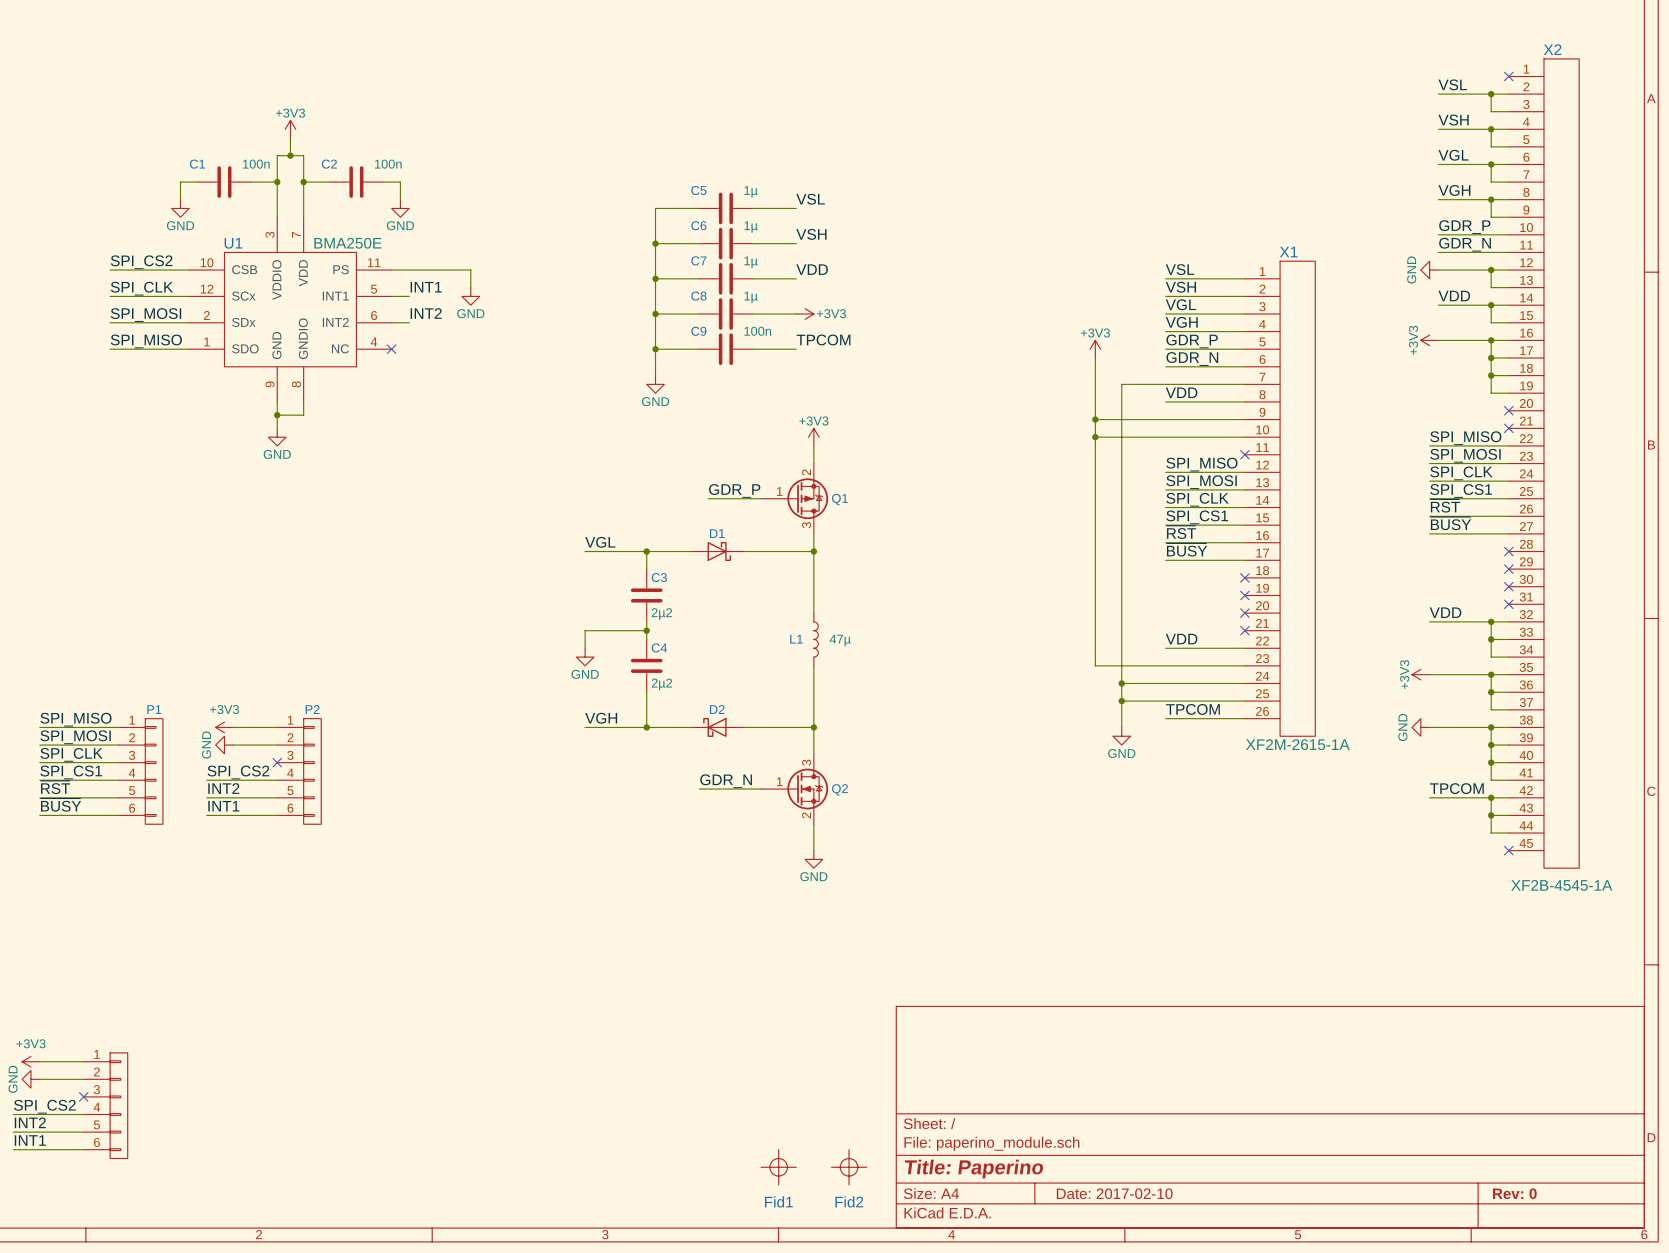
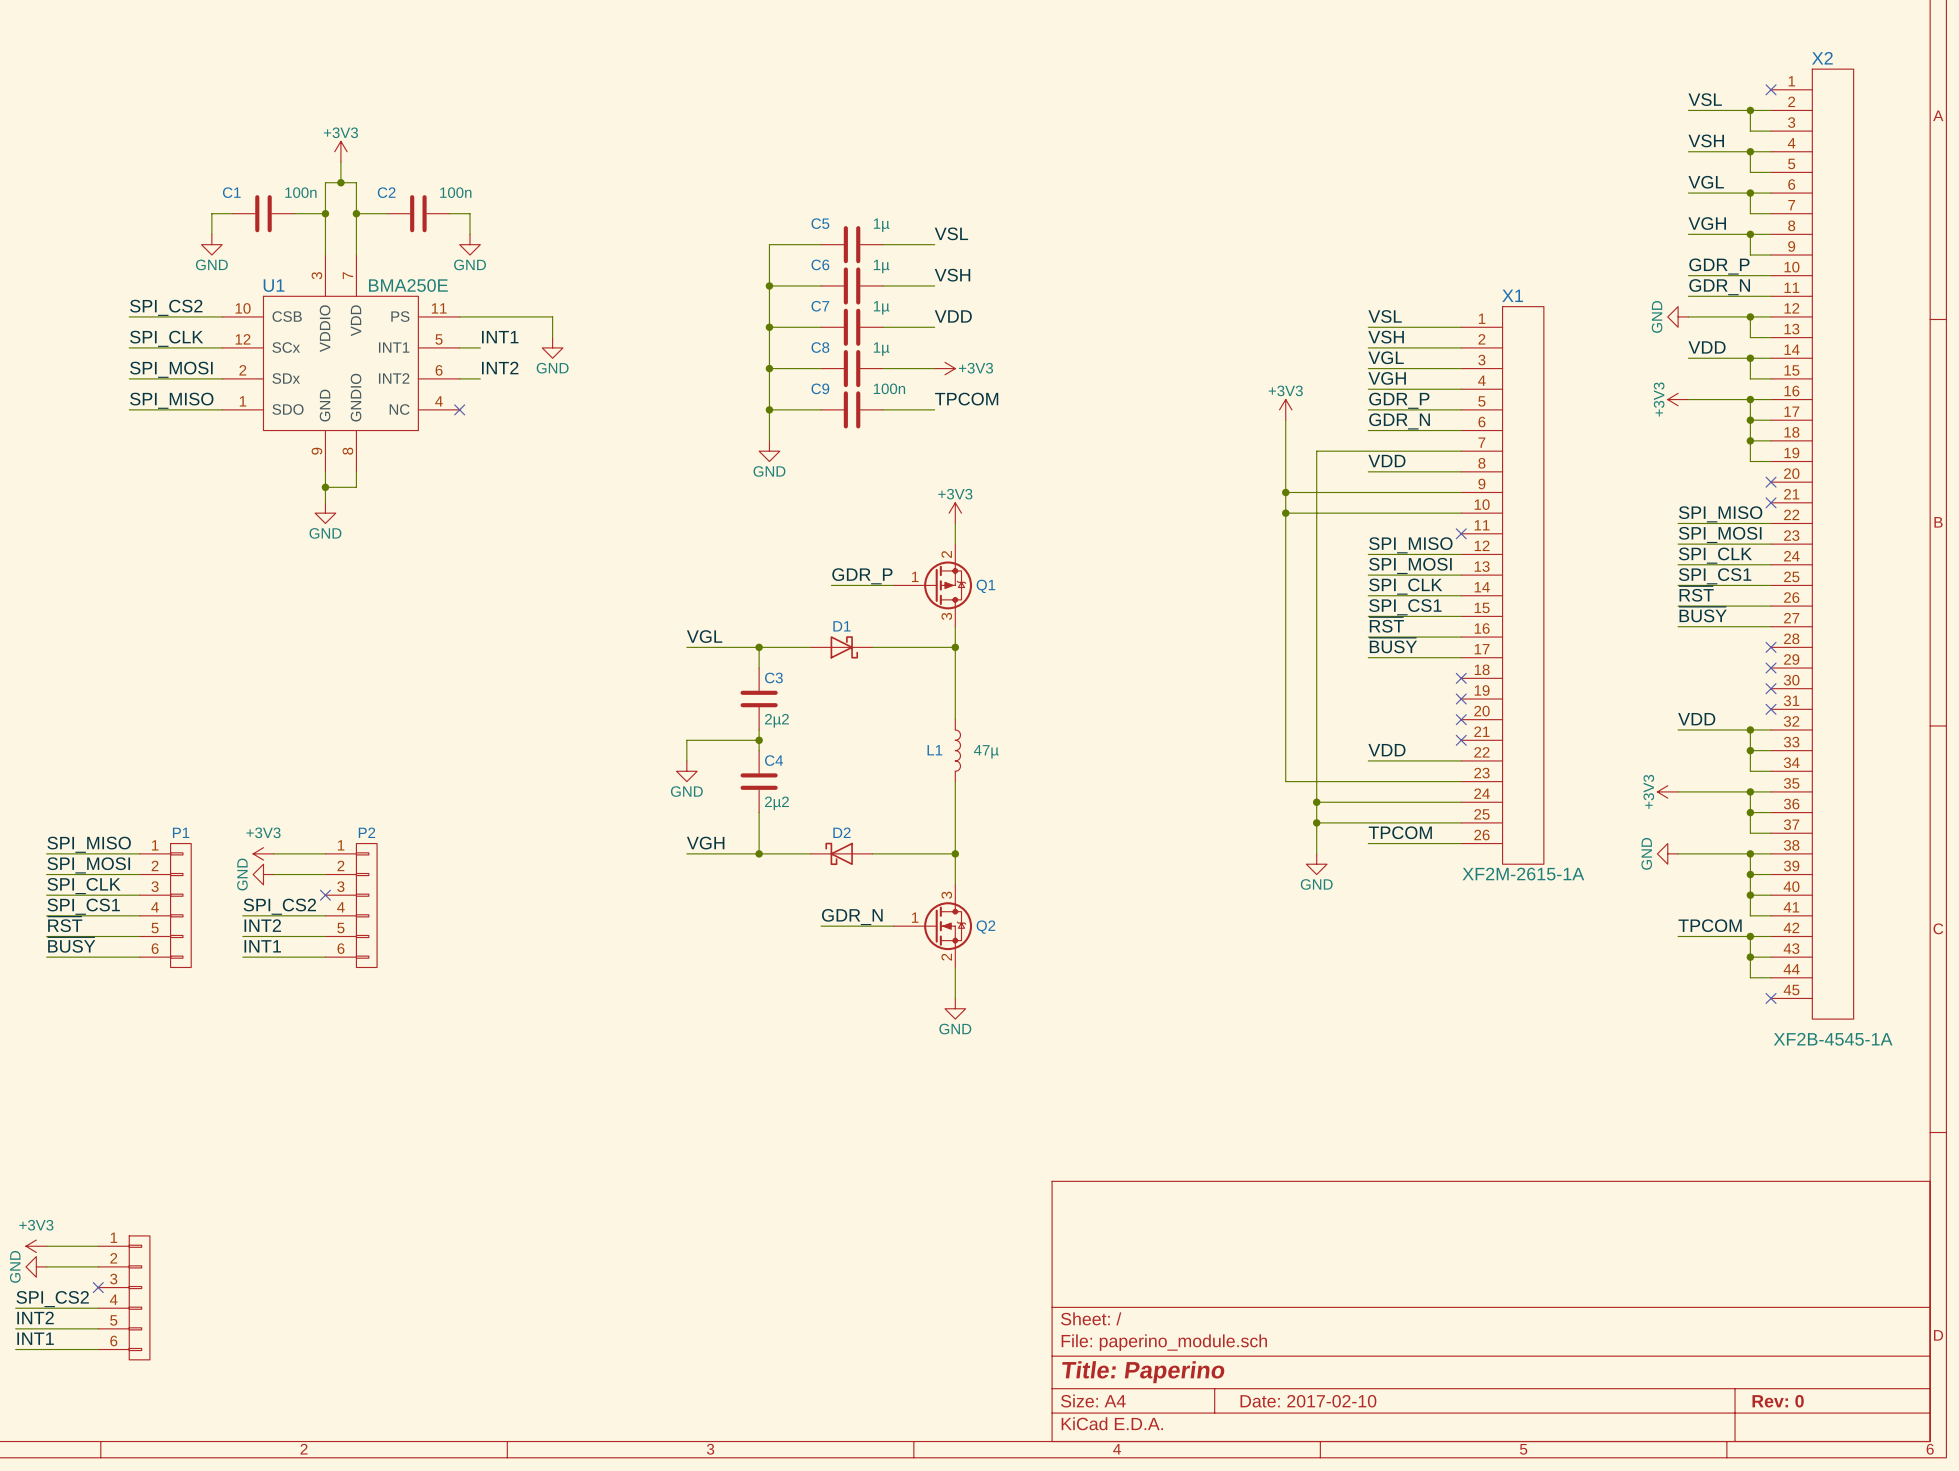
Fid1: (778, 1167) -> none
Fid2: (849, 1167) -> none

